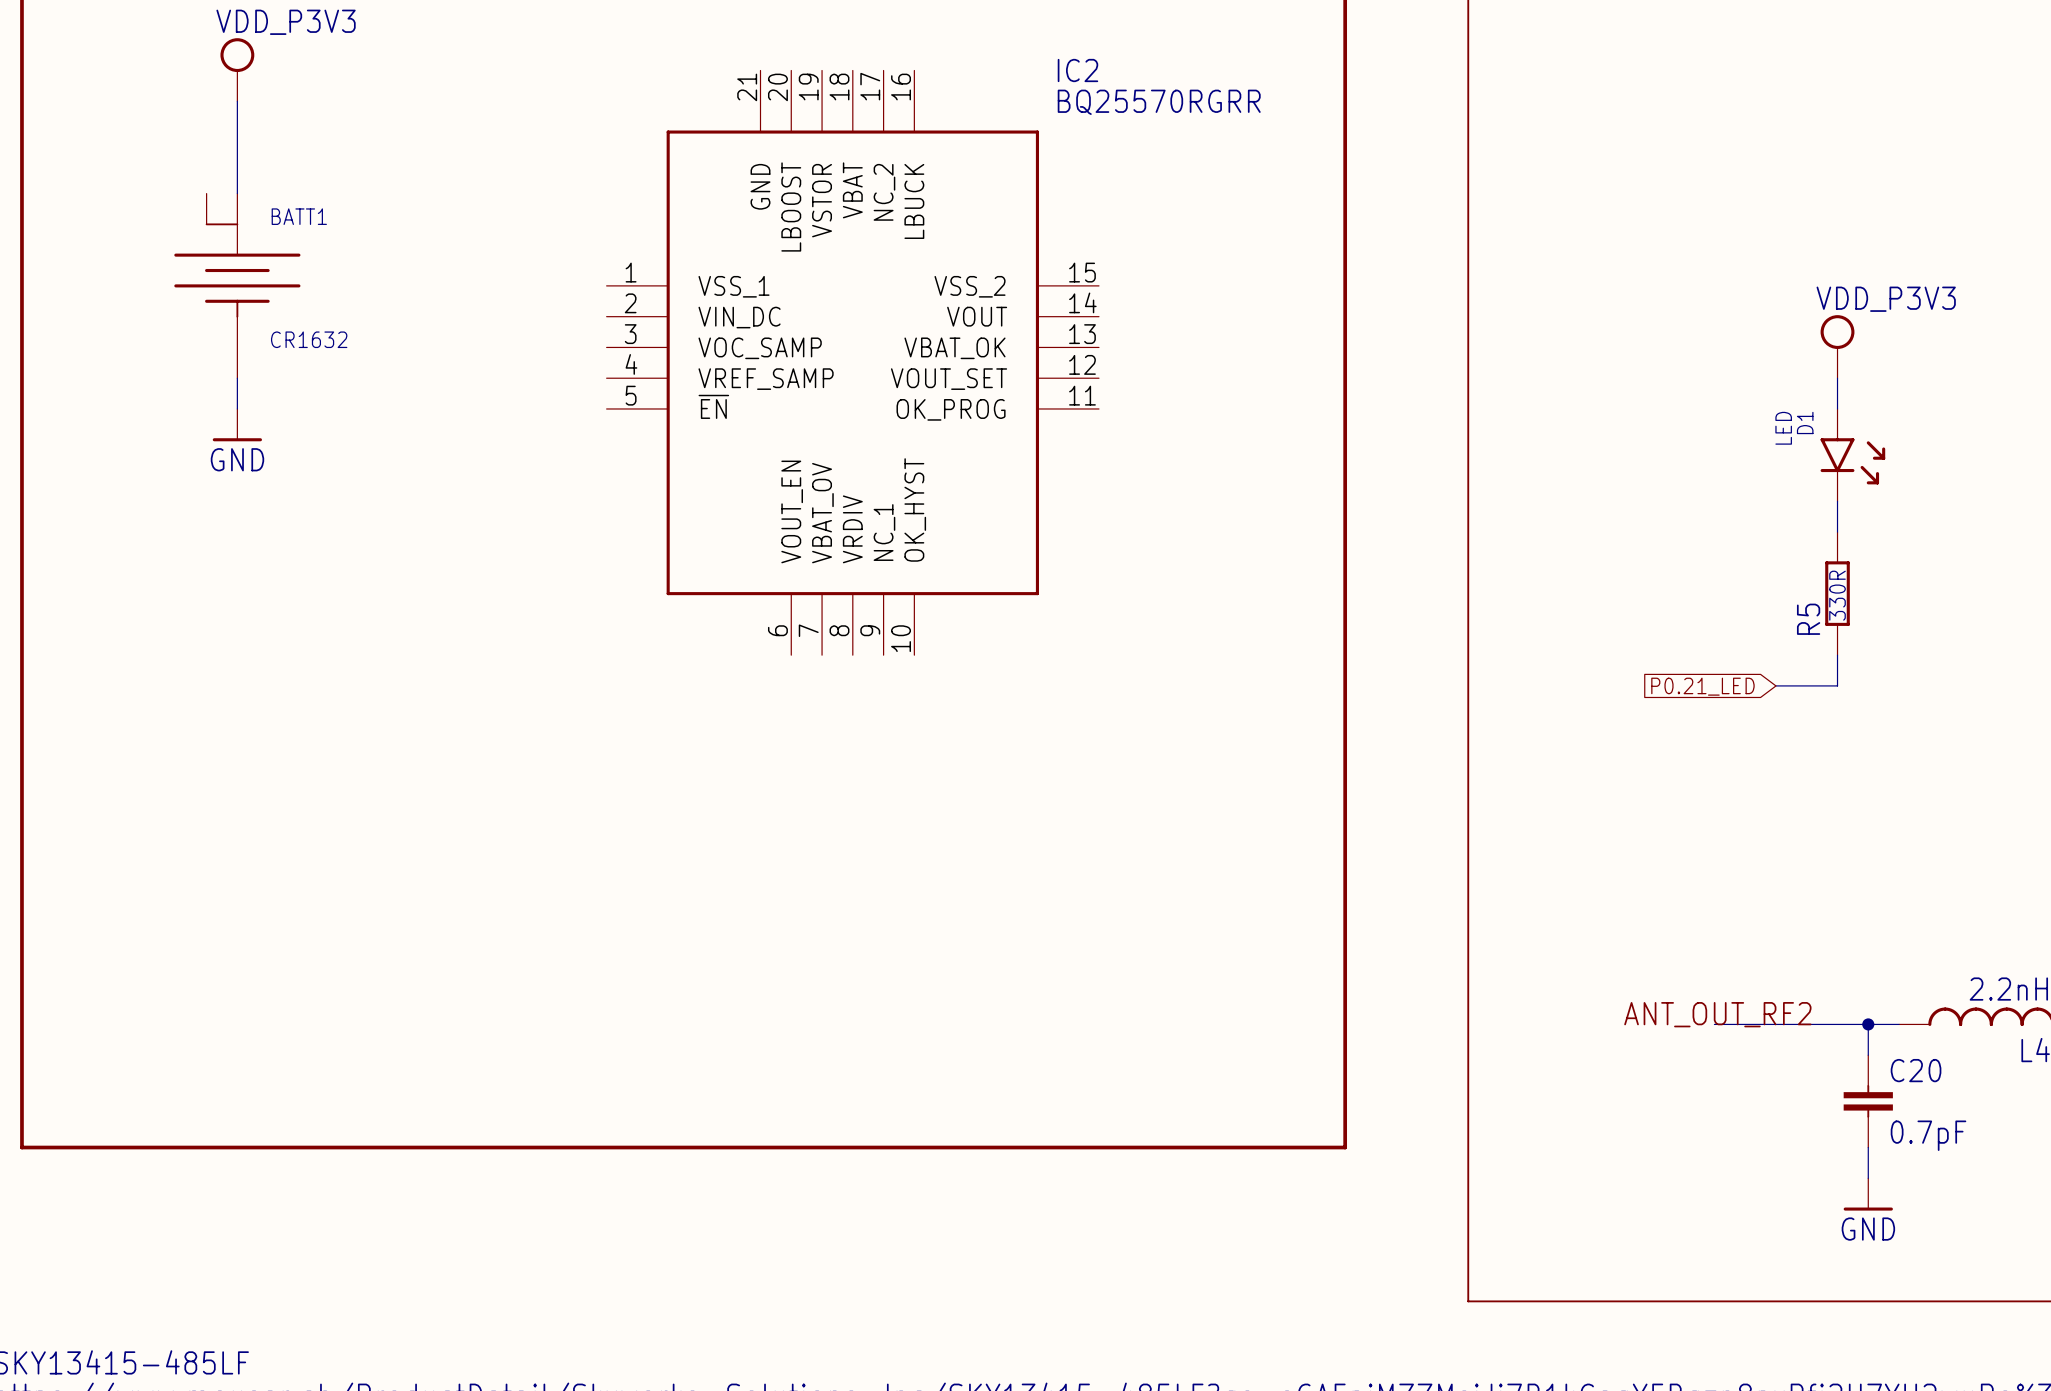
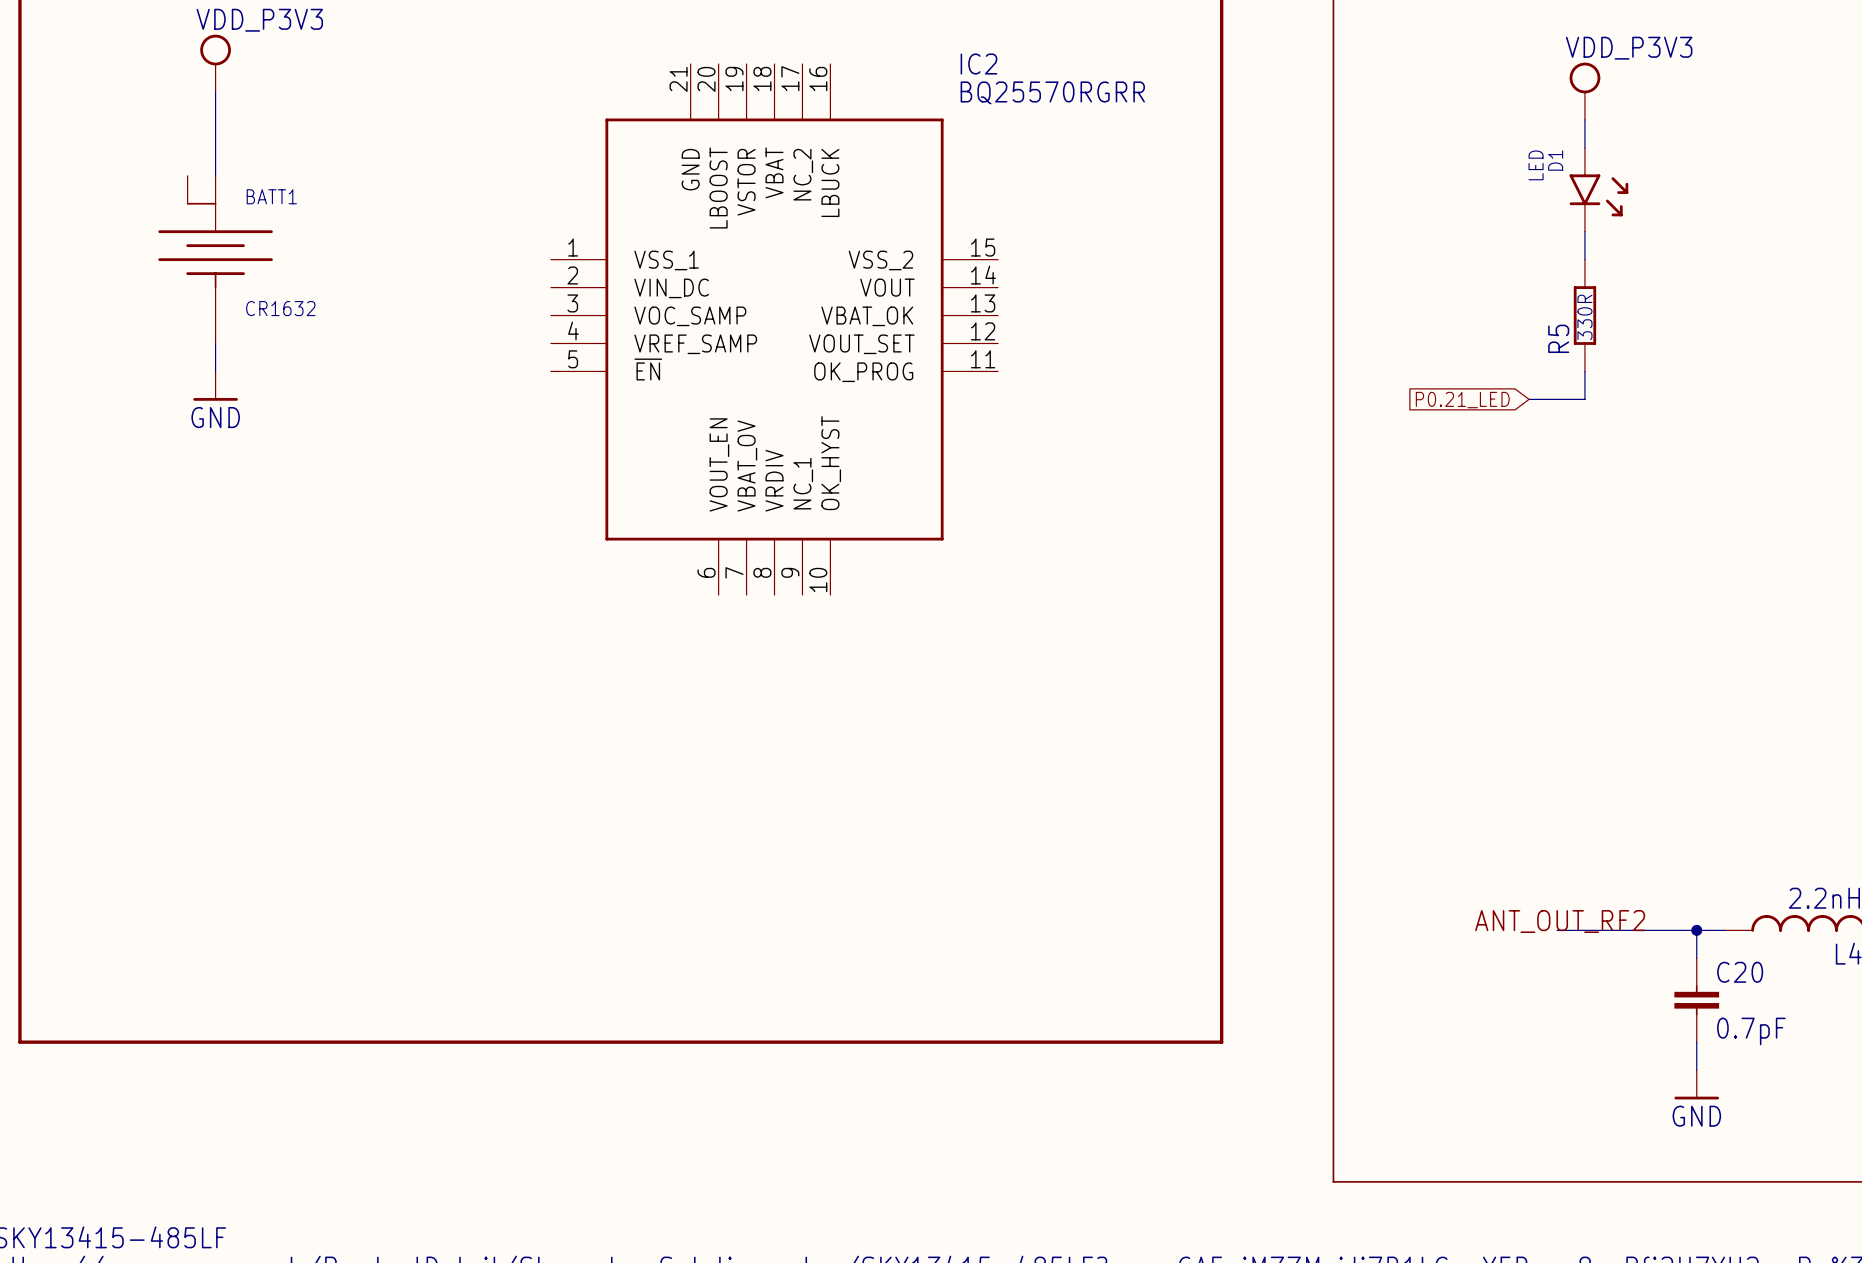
wire: none -> (1584, 119) (1584, 147)
power symbol position: VDD_P3V3 (1837, 346) -> VDD_P3V3 (1584, 91)
wire: (1837, 378) (1837, 408) -> (1584, 231) (1584, 259)
D1 position: (1852, 455) -> (1598, 189)
wire: (1837, 501) (1837, 532) -> none
R5 position: (1837, 593) -> (1584, 315)
wire: (1837, 655) (1837, 685) (1775, 685) -> (1584, 371) (1584, 399) (1529, 399)
global label position: P0.21_LED (1702, 686) -> P0.21_LED (1462, 400)

